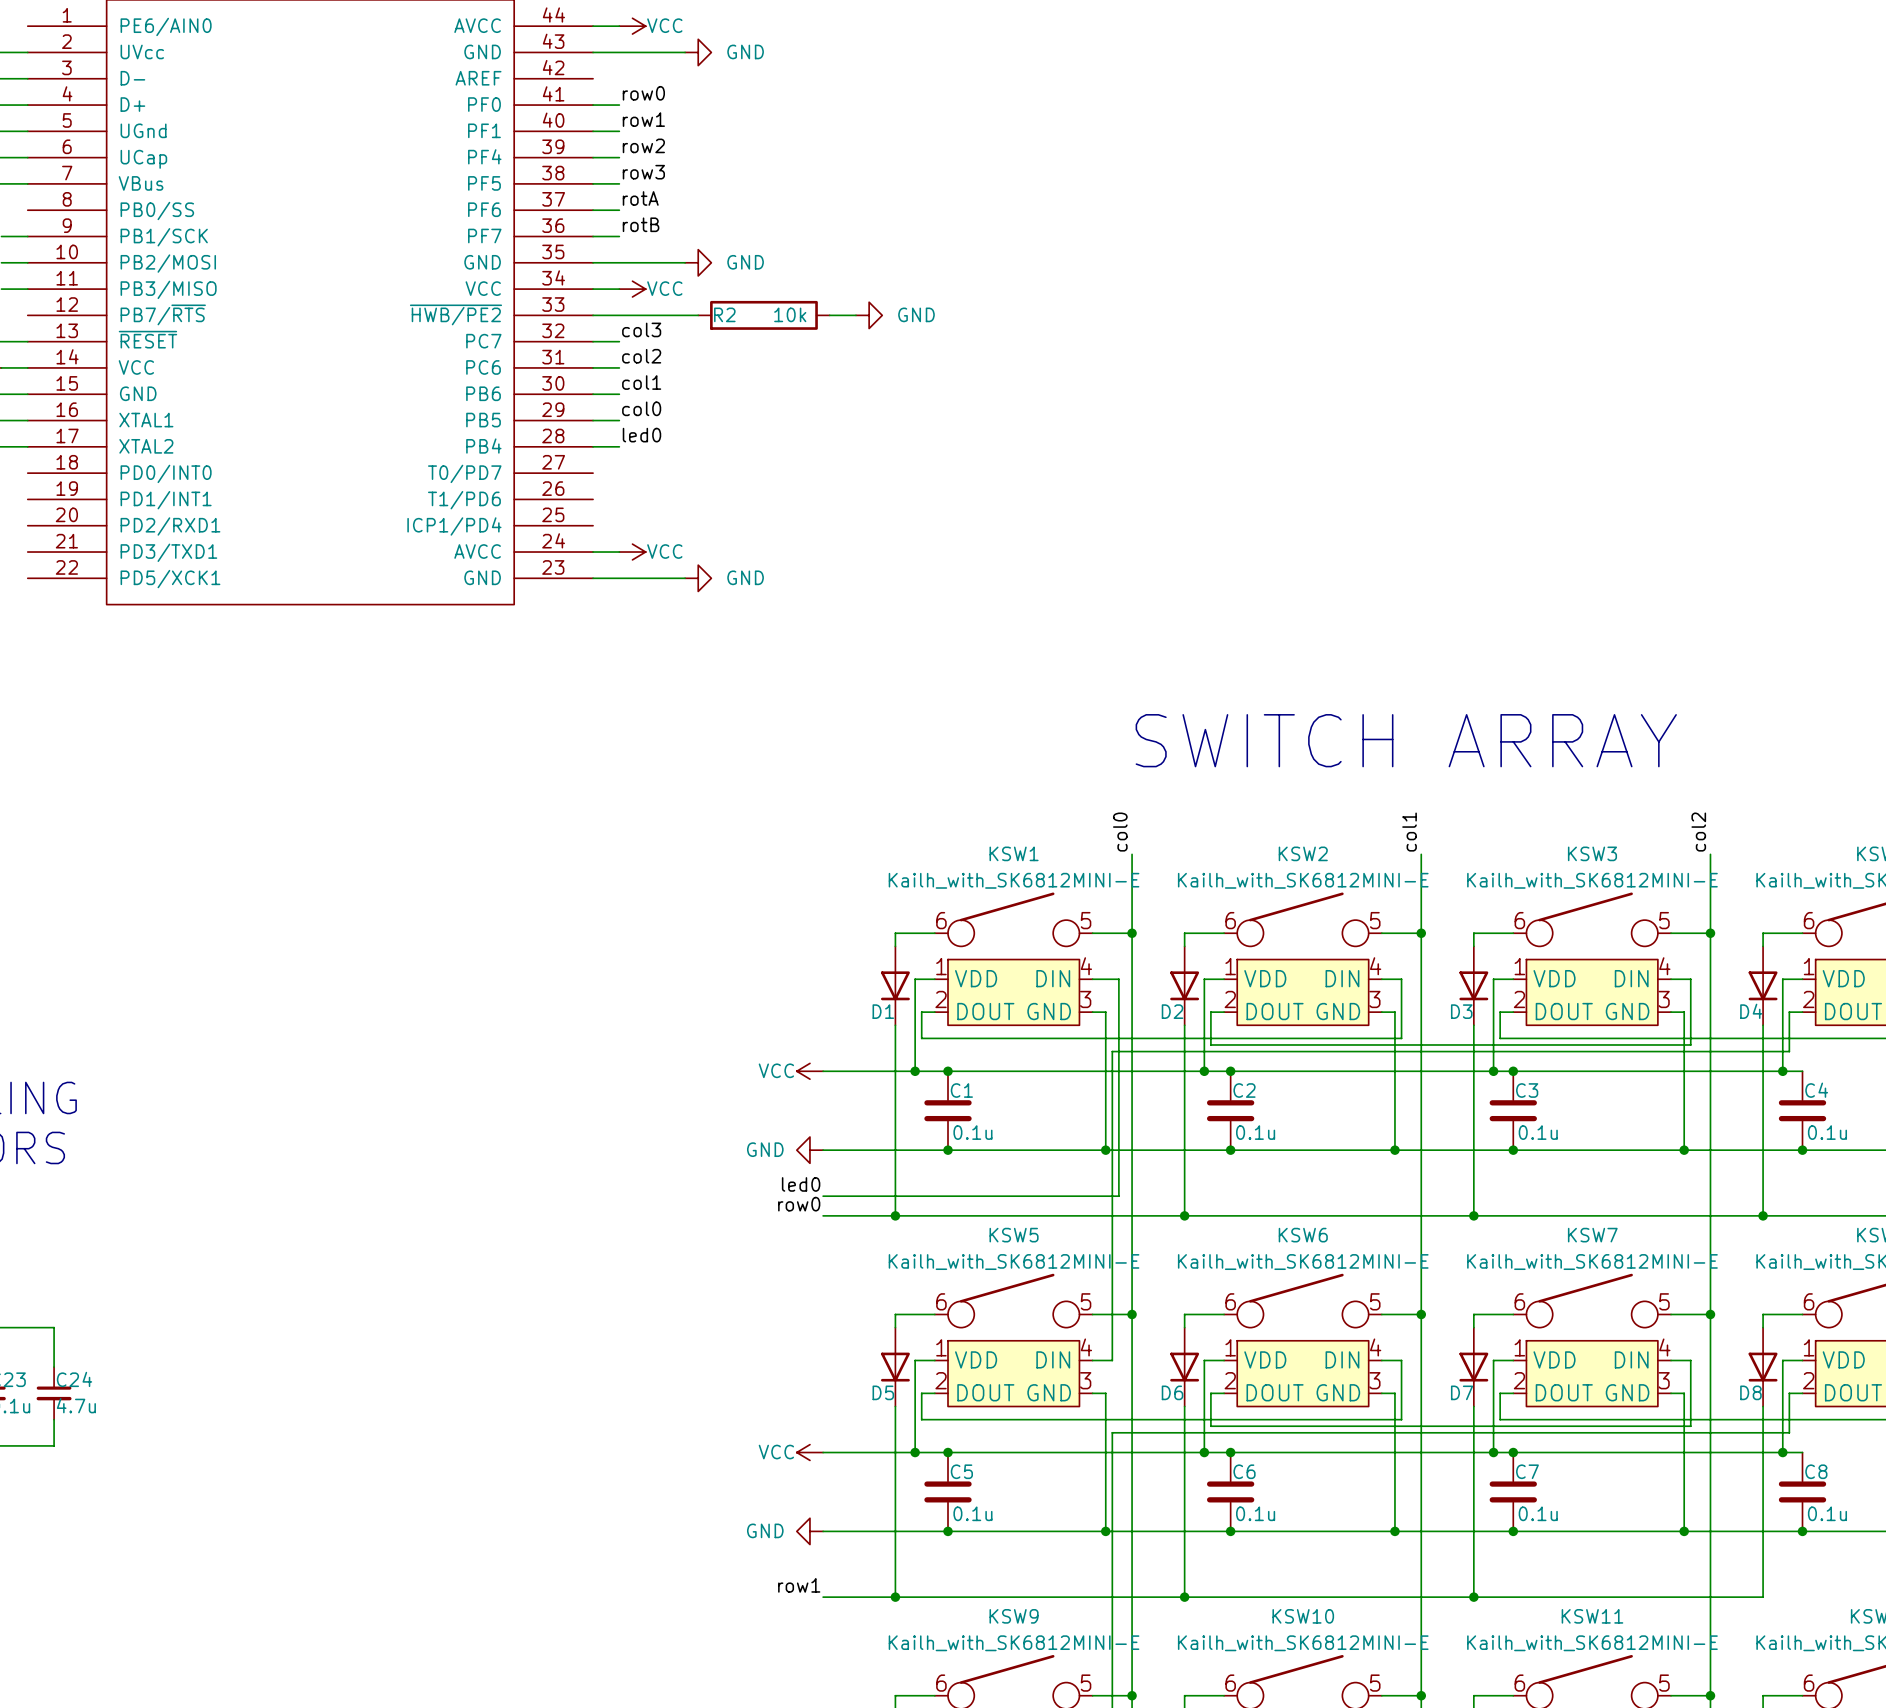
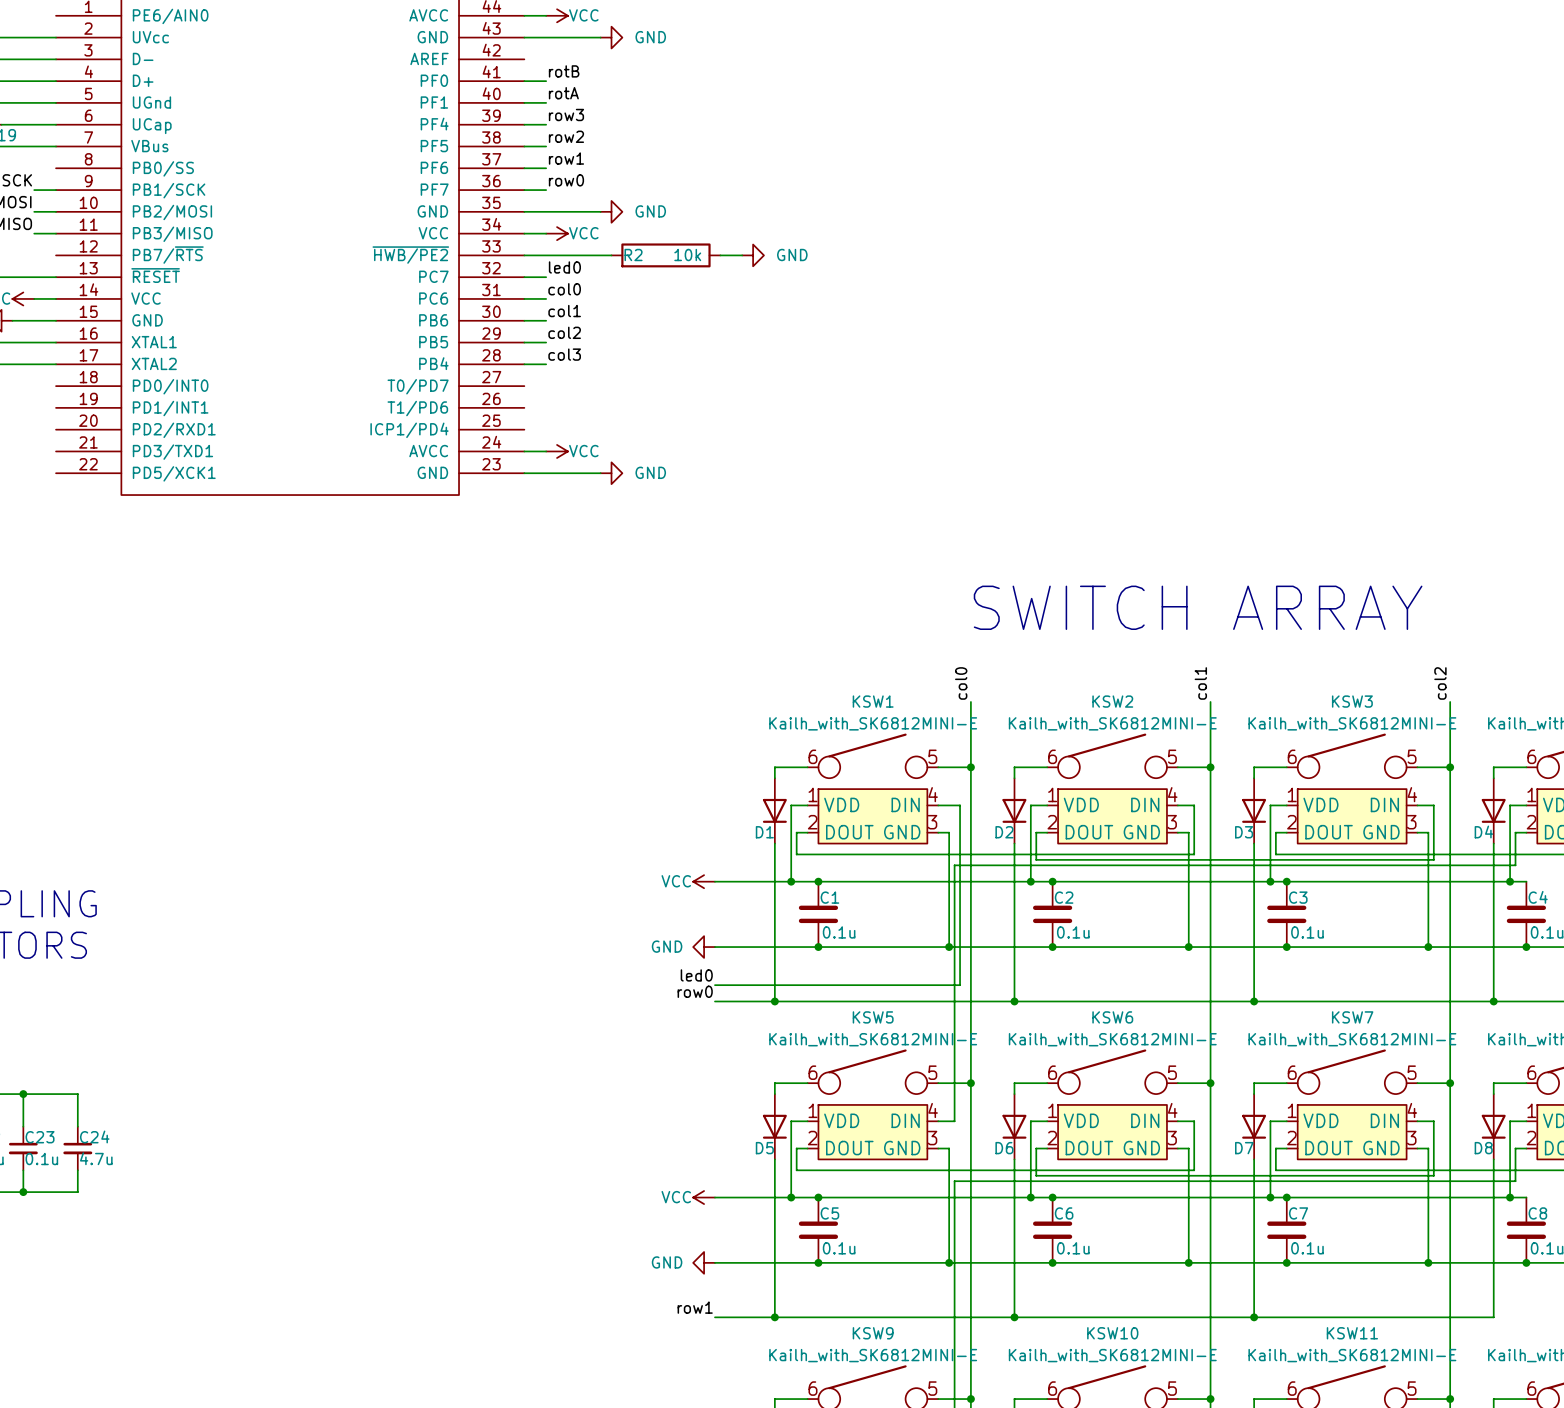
label: row0 (643, 93) -> rotB (564, 71)
label: row1 (643, 119) -> rotA (563, 93)
label: row2 (643, 145) -> row3 (566, 114)
label: row3 (643, 172) -> row2 (566, 136)
label: rotA (640, 198) -> row1 (566, 158)
label: rotB (641, 224) -> row0 (566, 180)
label: col3 (641, 329) -> led0 (564, 267)
label: col2 (641, 356) -> col0 (564, 289)
label: col0 (641, 408) -> col2 (564, 332)
label: led0 (641, 435) -> col3 (564, 354)

